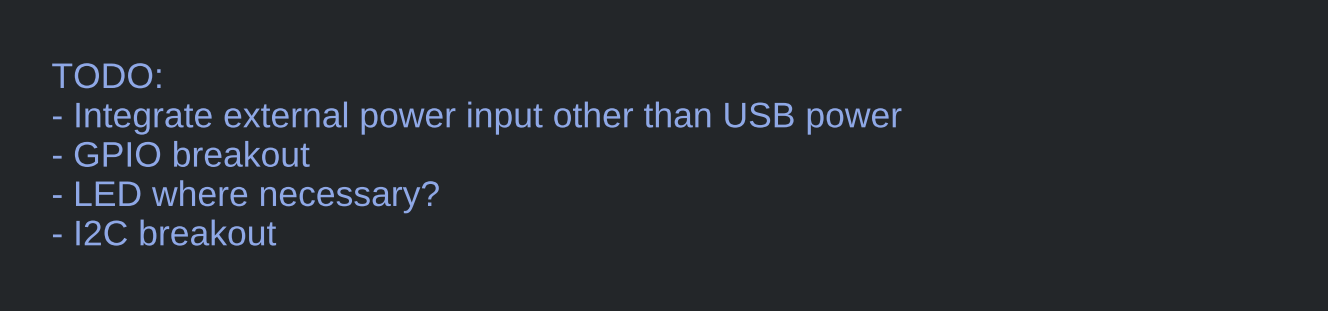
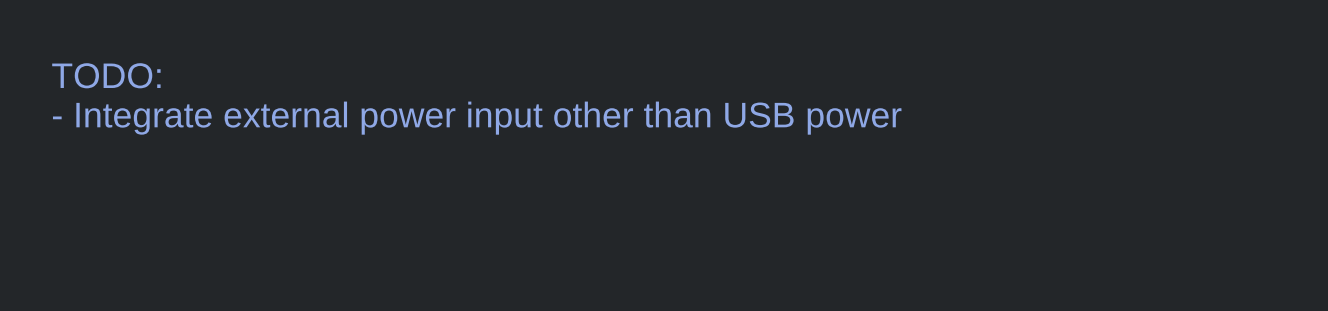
text: - GPIO breakout (181, 153) -> none
text: - LED where necessary? (245, 196) -> none
text: - I2C breakout (164, 232) -> none

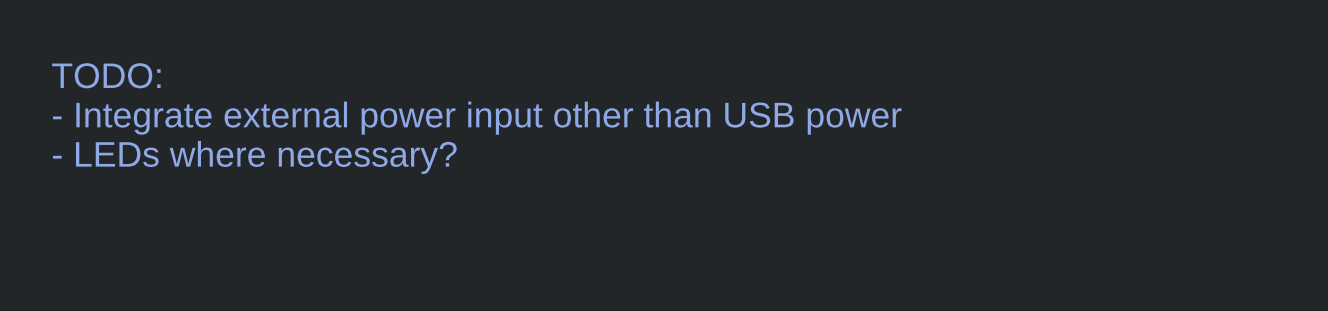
text: none -> - LEDs where necessary? (254, 157)

